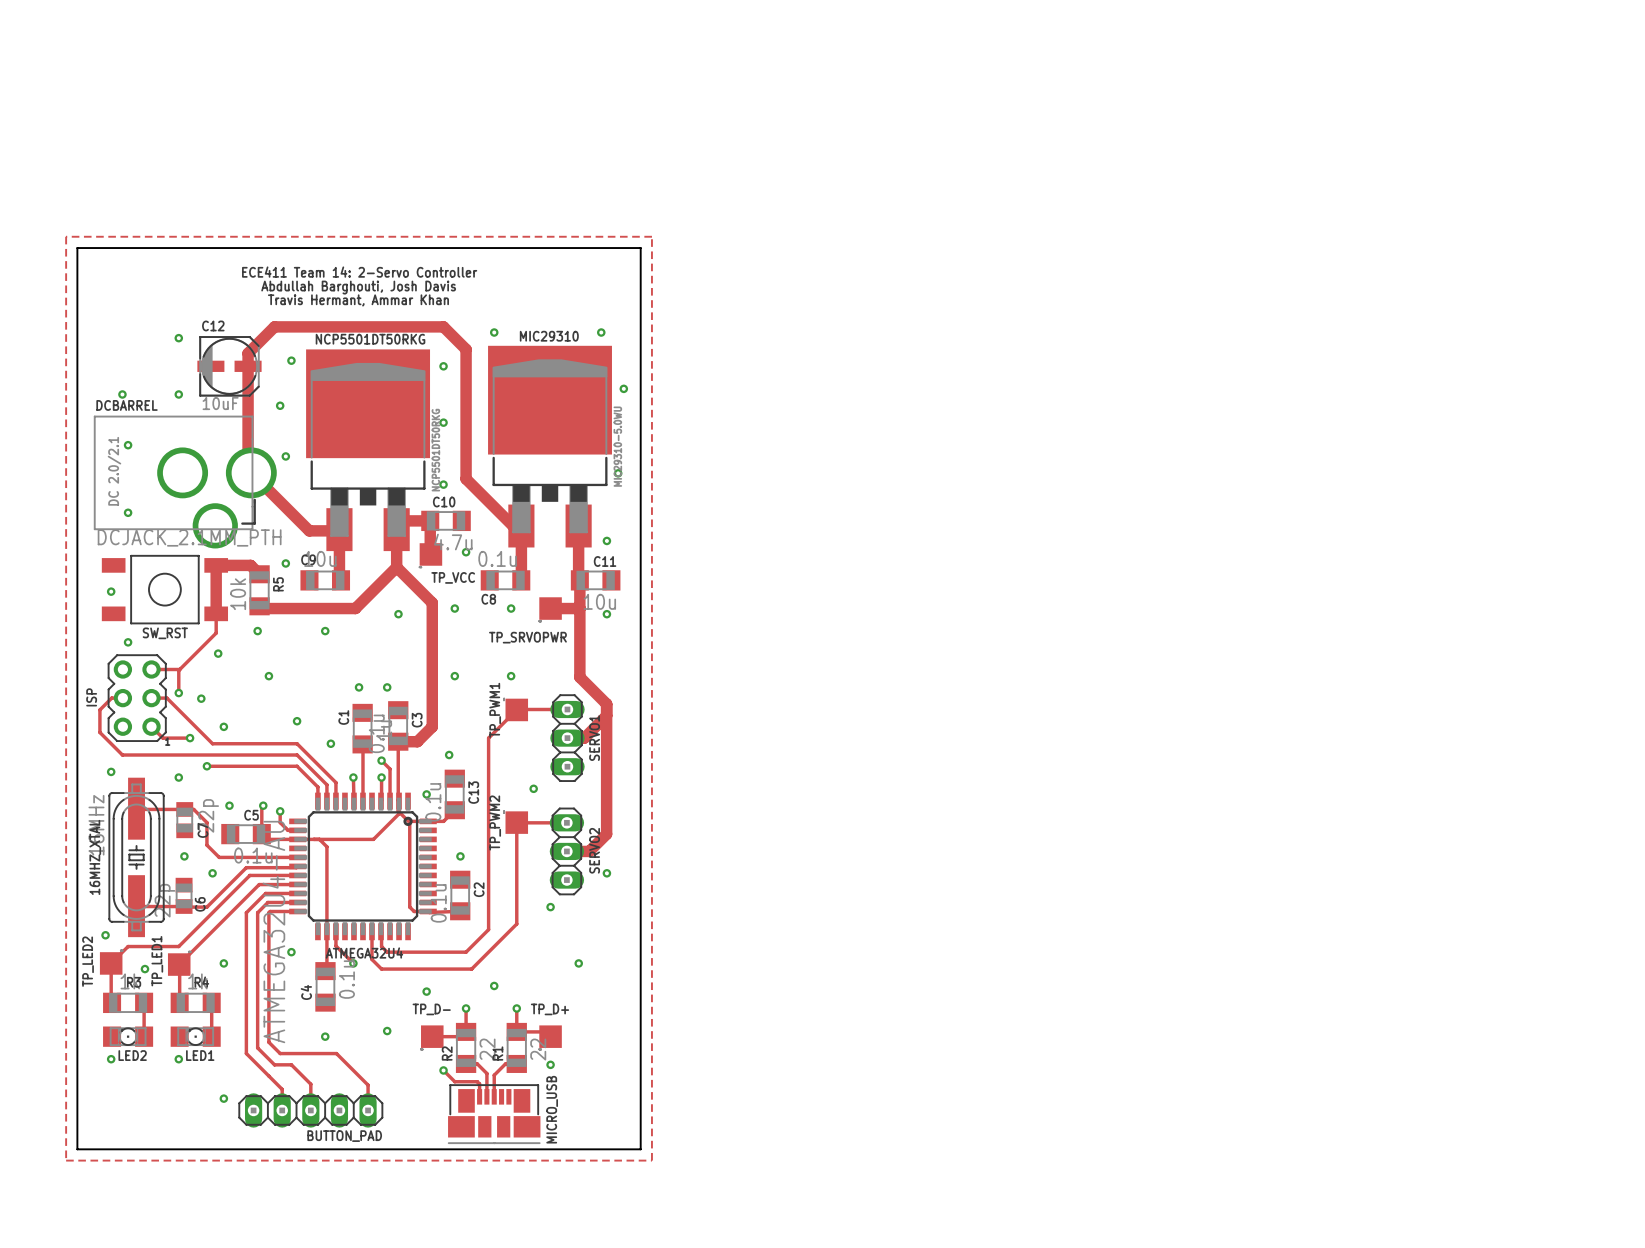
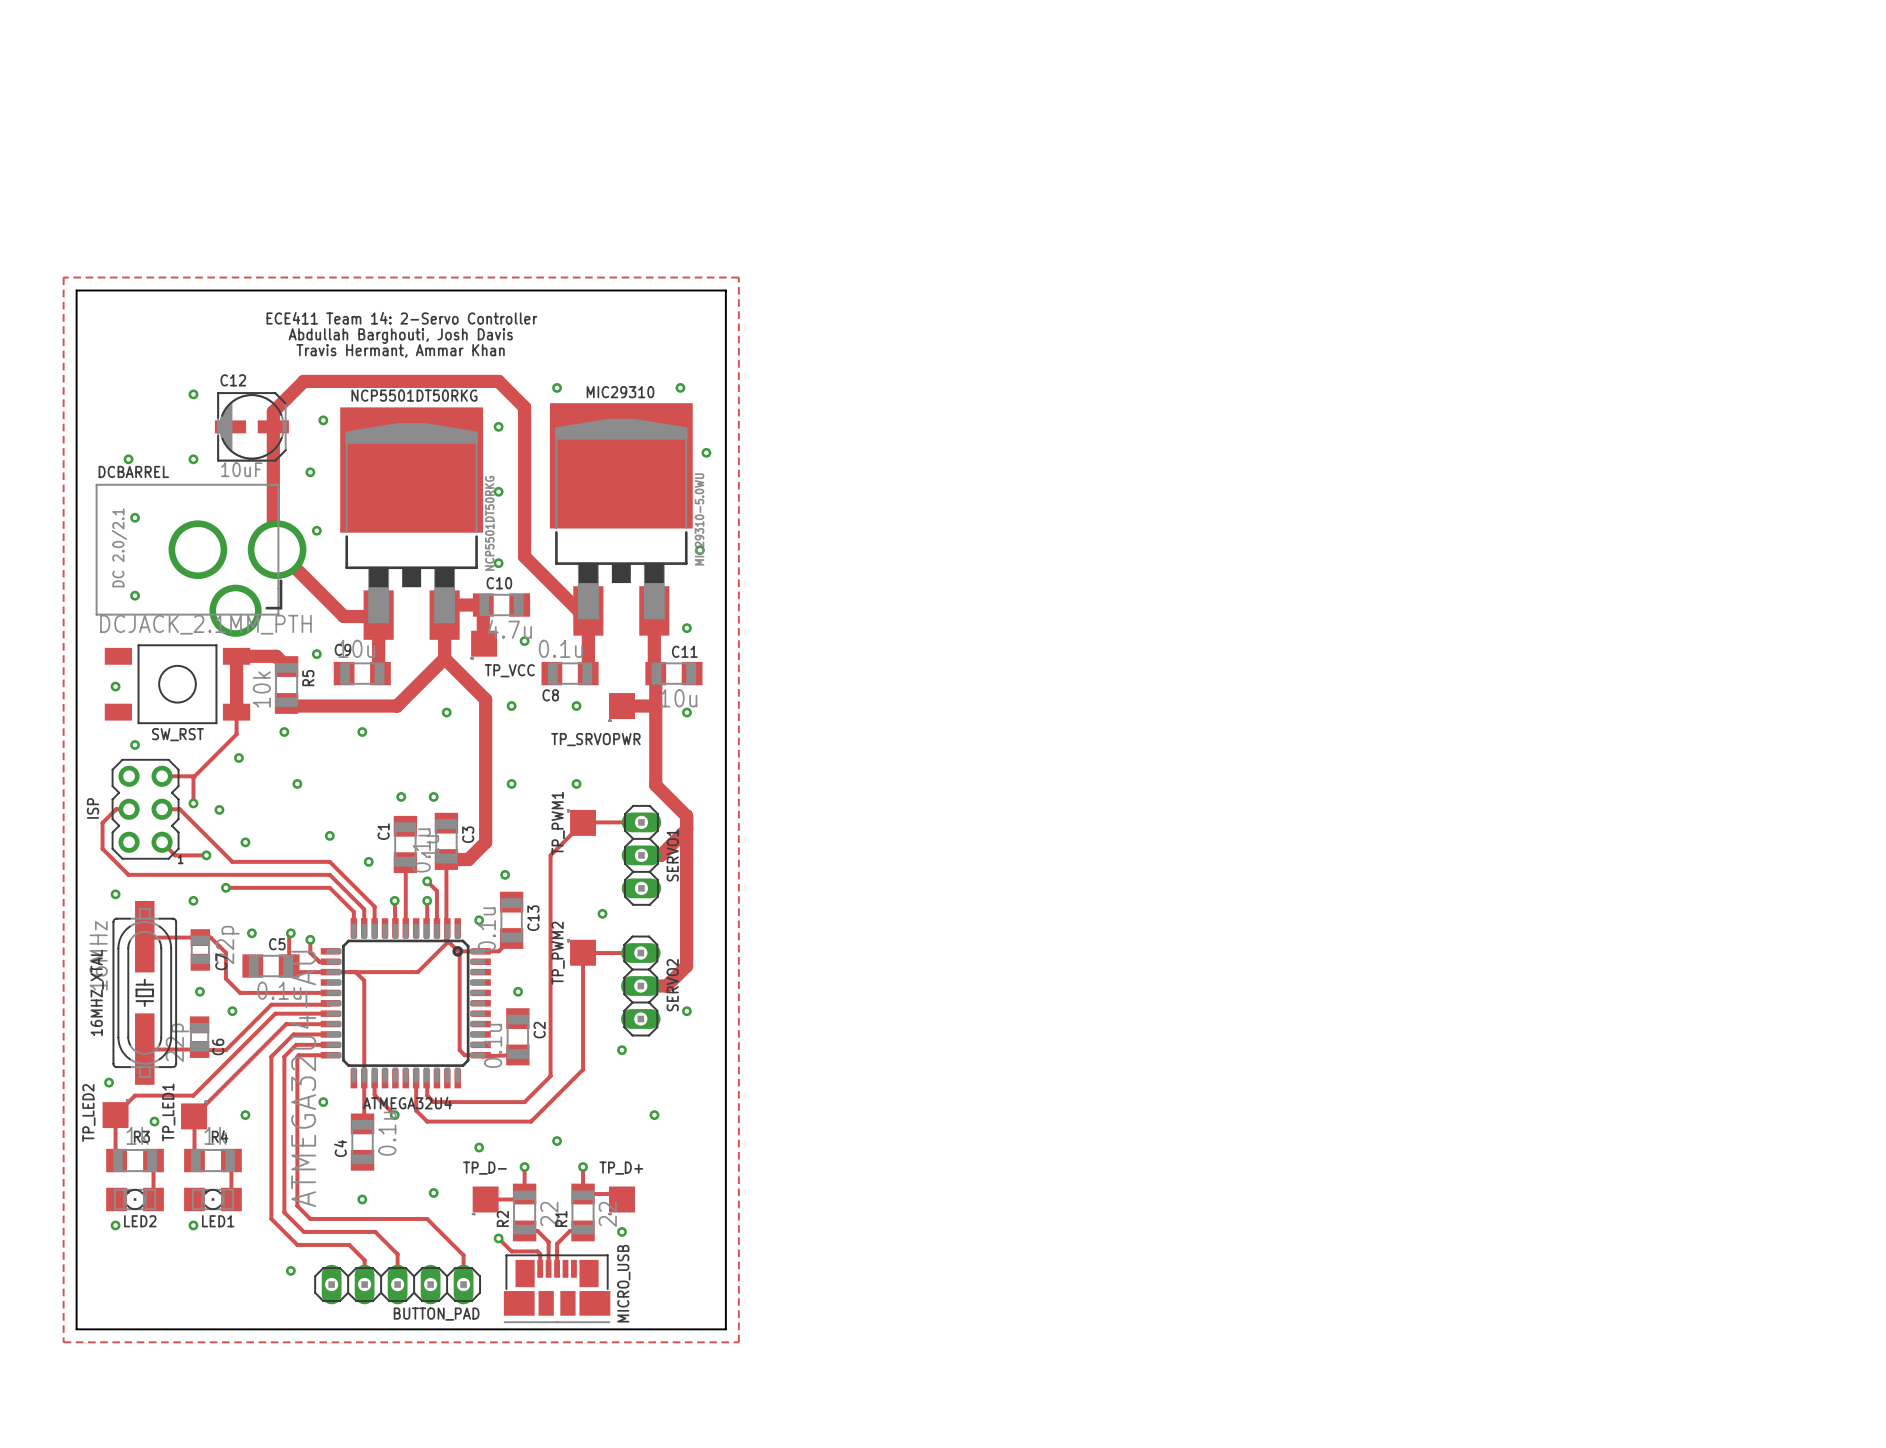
track: (336, 1053) (368, 1085) (368, 1110) -> (375, 1218) (427, 1218) (463, 1255) (463, 1284)
track: (291, 1064) (310, 1084) (310, 1110) -> (323, 1231) (375, 1231) (397, 1254) (397, 1284)
track: (268, 1076) (282, 1089) (282, 1110) -> (297, 1244) (349, 1244) (364, 1260) (364, 1284)
via position: (223, 1098) -> (290, 1270)
BUTTON_PAD position: (310, 1110) -> (397, 1284)

